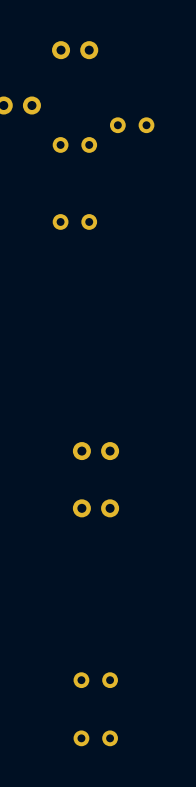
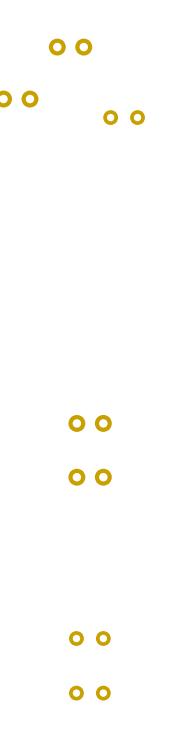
part: (74, 144) -> none
part: (74, 221) -> none

